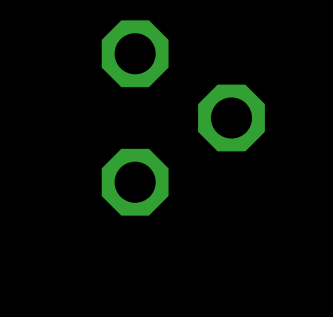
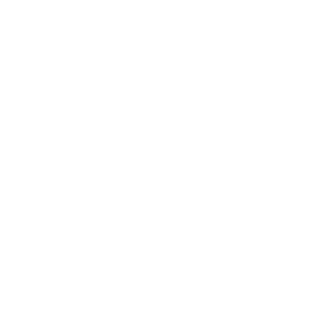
part: (183, 117) -> none

